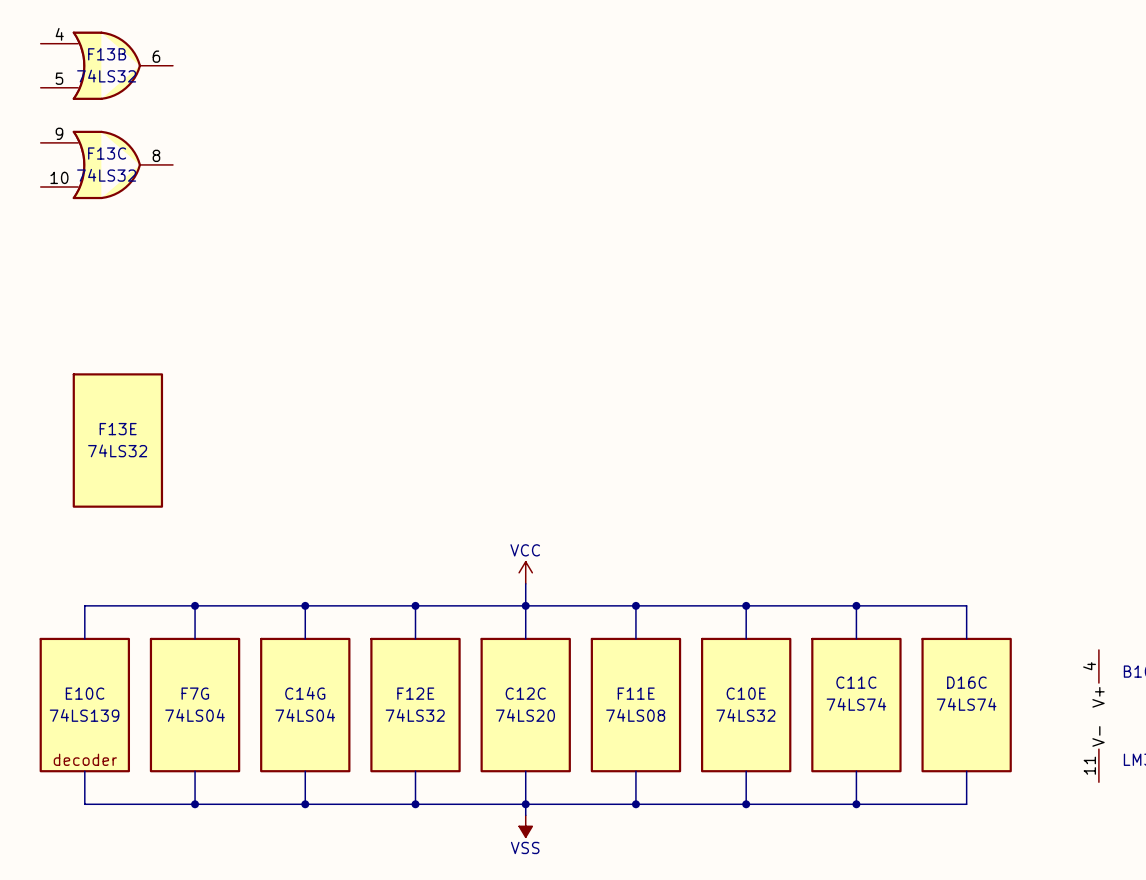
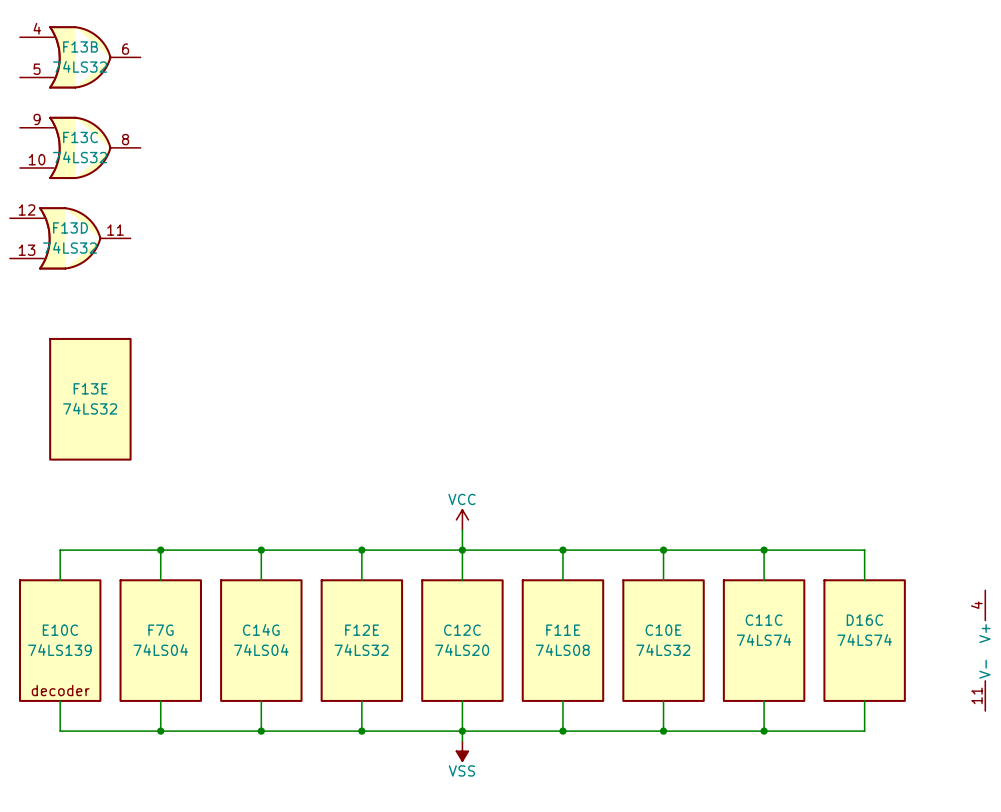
F13D: none -> 74LS32 (70, 238)

